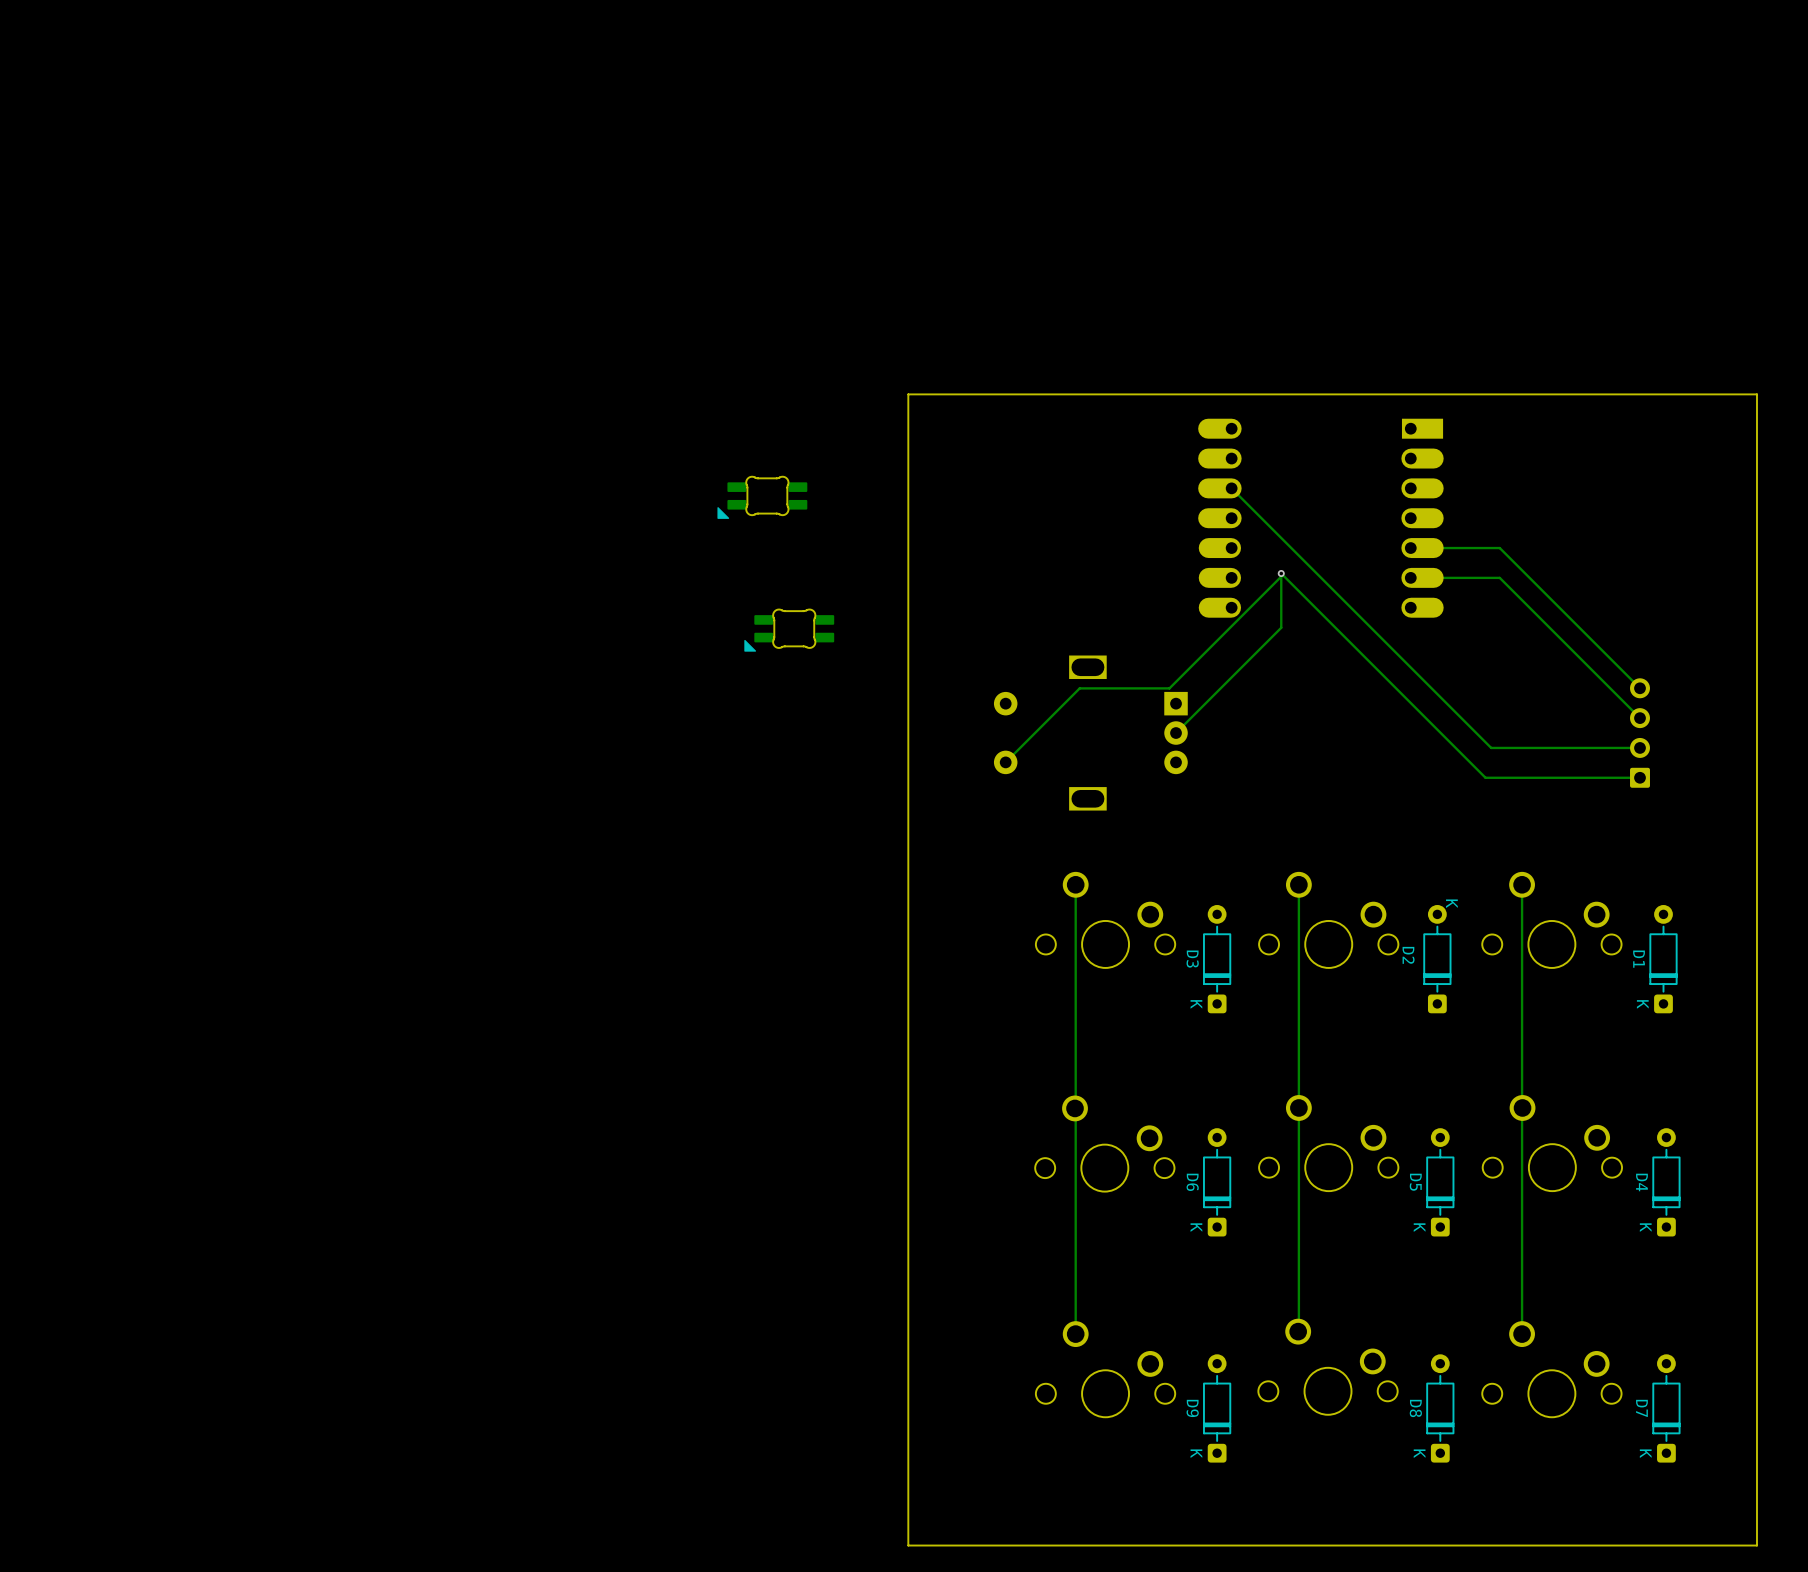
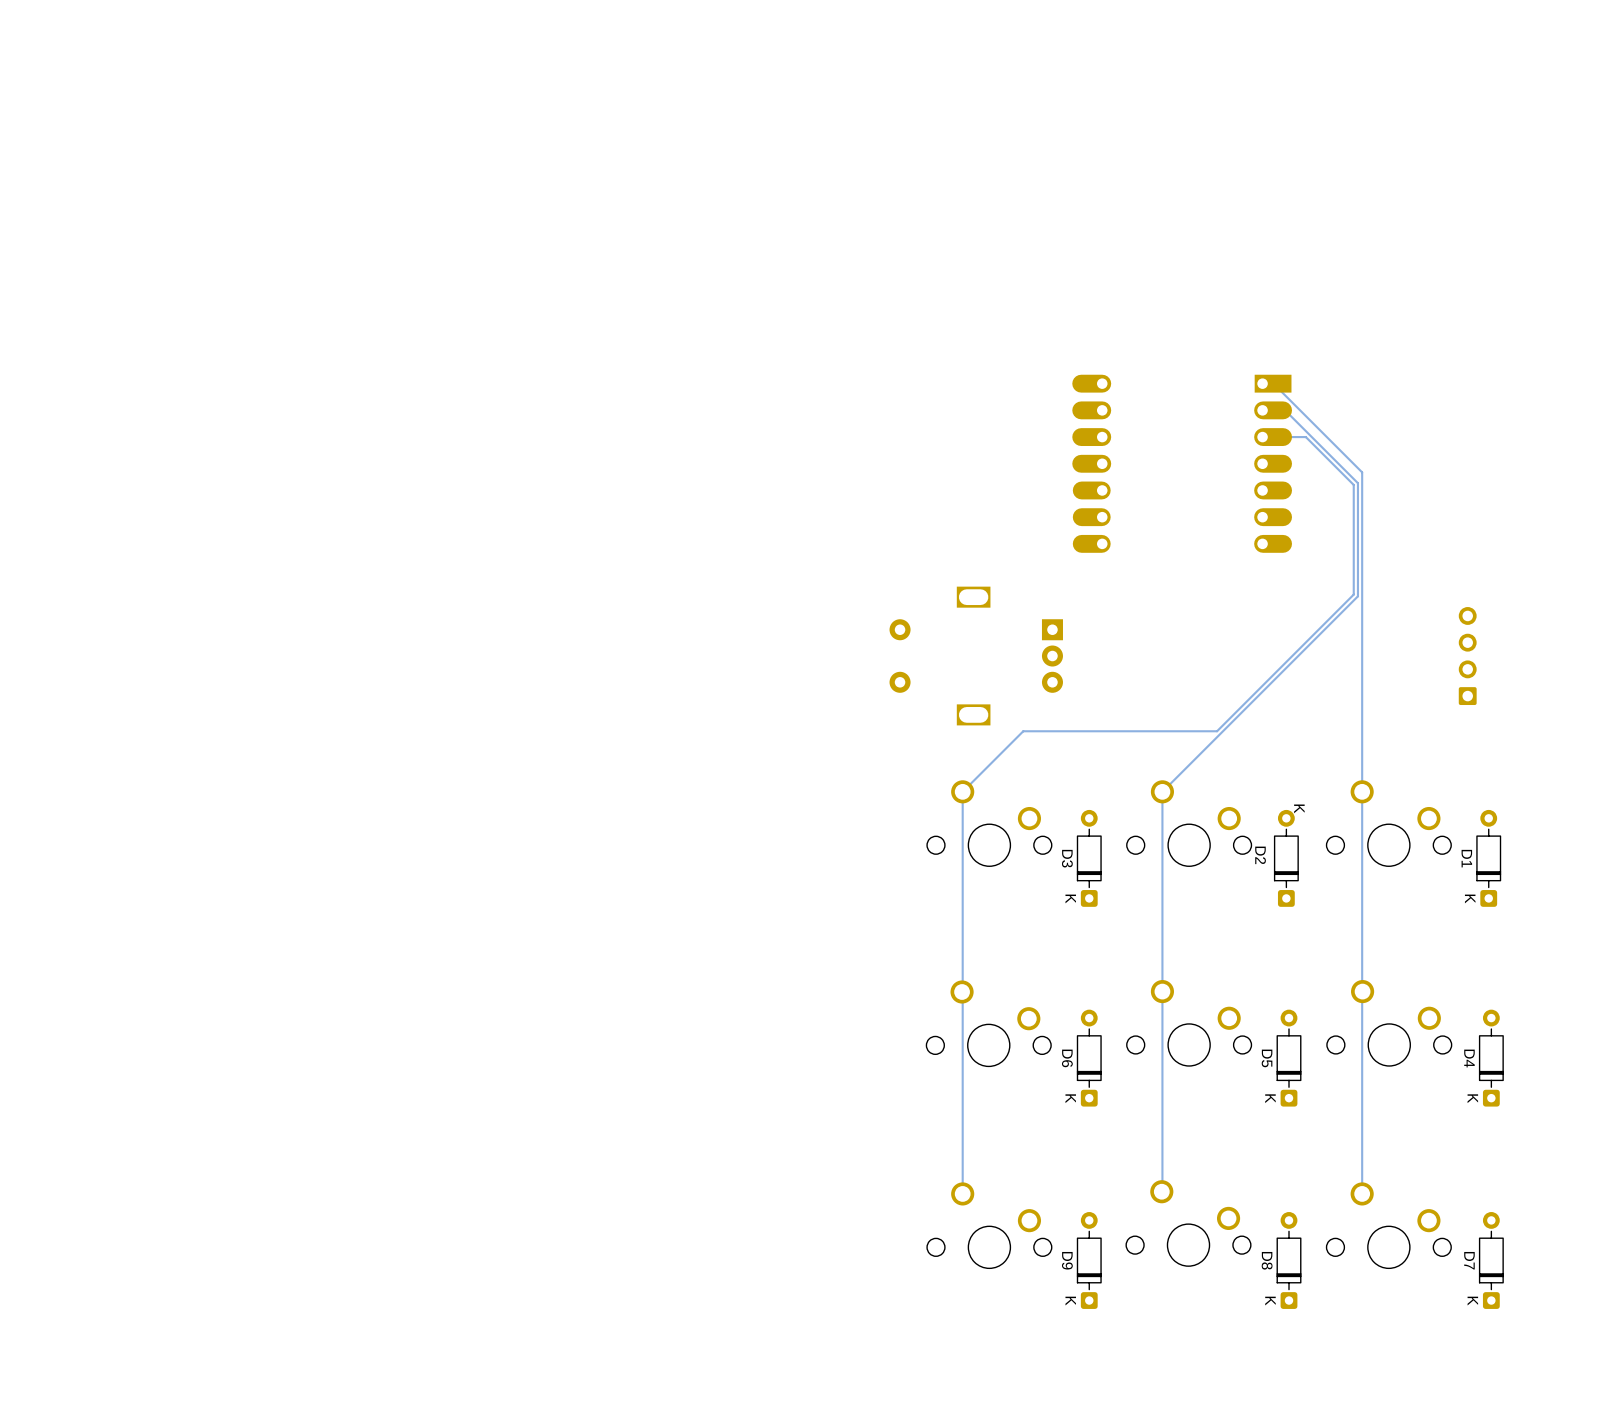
board edge: (1756, 394) (908, 394) (908, 1545) (1756, 1545) (1756, 394) -> none
track: none -> (1273, 383) (1362, 472) (1362, 791)
track: none -> (1285, 410) (1357, 483) (1357, 596) (1162, 791)
track: (1231, 488) (1491, 747) (1640, 747) -> none
track: none -> (1262, 437) (1305, 437) (1353, 484) (1353, 594) (1217, 731) (1023, 731) (962, 791)
part: (762, 497) -> none
track: (1410, 548) (1499, 548) (1640, 688) -> none
via: (1281, 573) -> none
track: (1281, 576) (1169, 688) (1079, 688) (1005, 762) -> none
track: (1410, 577) (1499, 577) (1640, 718) -> none
part: (789, 630) -> none
track: (1176, 733) (1281, 627) (1281, 573) (1485, 777) (1640, 777) -> none

